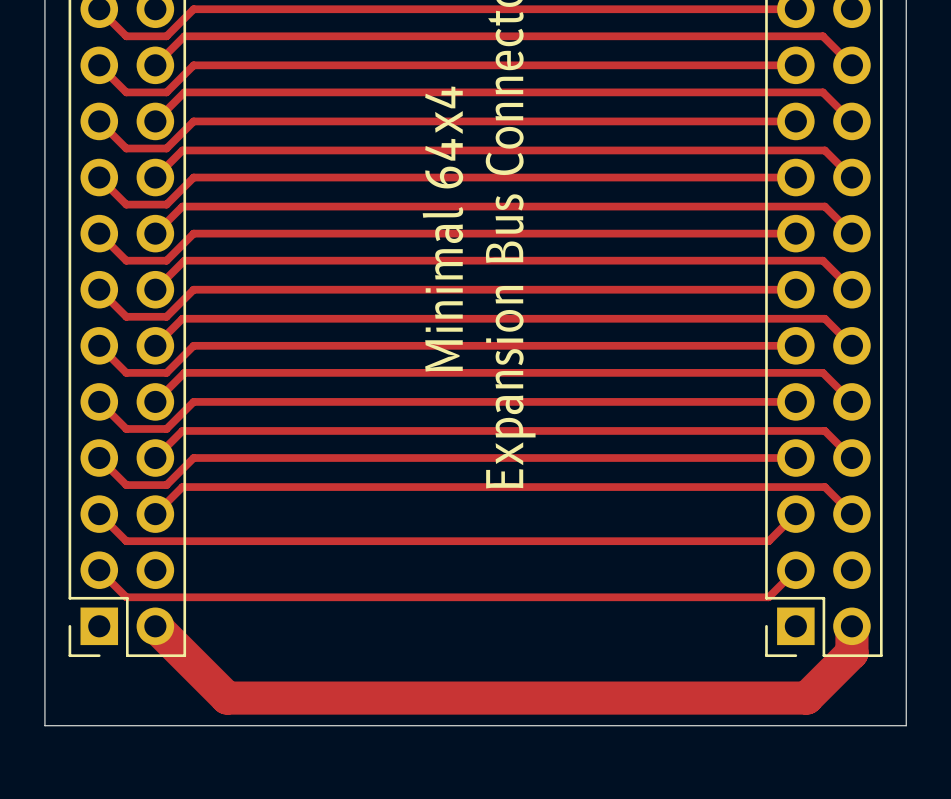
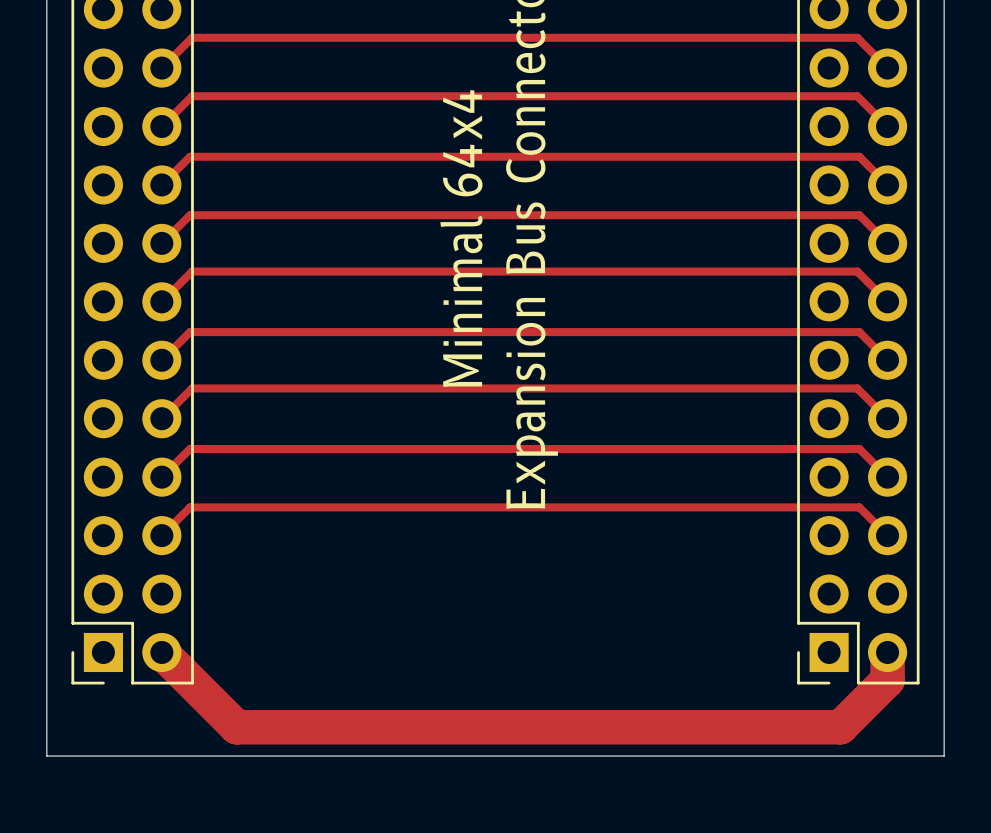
track: (99, 9) (126, 36) (166, 36) (193, 9) (795, 9) -> none
track: (99, 65) (126, 92) (166, 92) (193, 65) (795, 65) -> none
track: (99, 121) (126, 148) (166, 148) (193, 121) (795, 121) -> none
track: (99, 177) (126, 204) (166, 204) (193, 177) (795, 177) -> none
track: (99, 233) (126, 260) (166, 260) (193, 233) (795, 233) -> none
track: (99, 289) (126, 316) (166, 316) (193, 289) (795, 289) -> none
track: (99, 345) (126, 372) (166, 372) (193, 345) (795, 345) -> none
track: (99, 401) (126, 428) (166, 428) (193, 401) (795, 401) -> none
track: (99, 458) (126, 485) (166, 485) (193, 458) (795, 458) -> none
track: (99, 514) (126, 541) (768, 541) (795, 514) -> none
track: (99, 570) (126, 597) (768, 597) (795, 570) -> none

